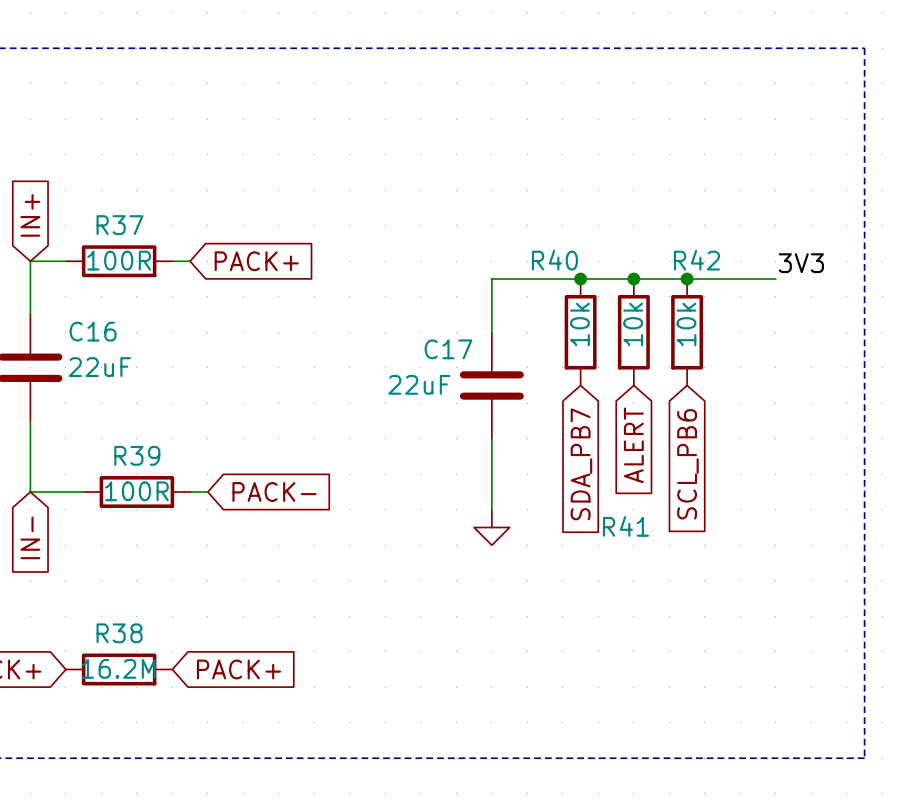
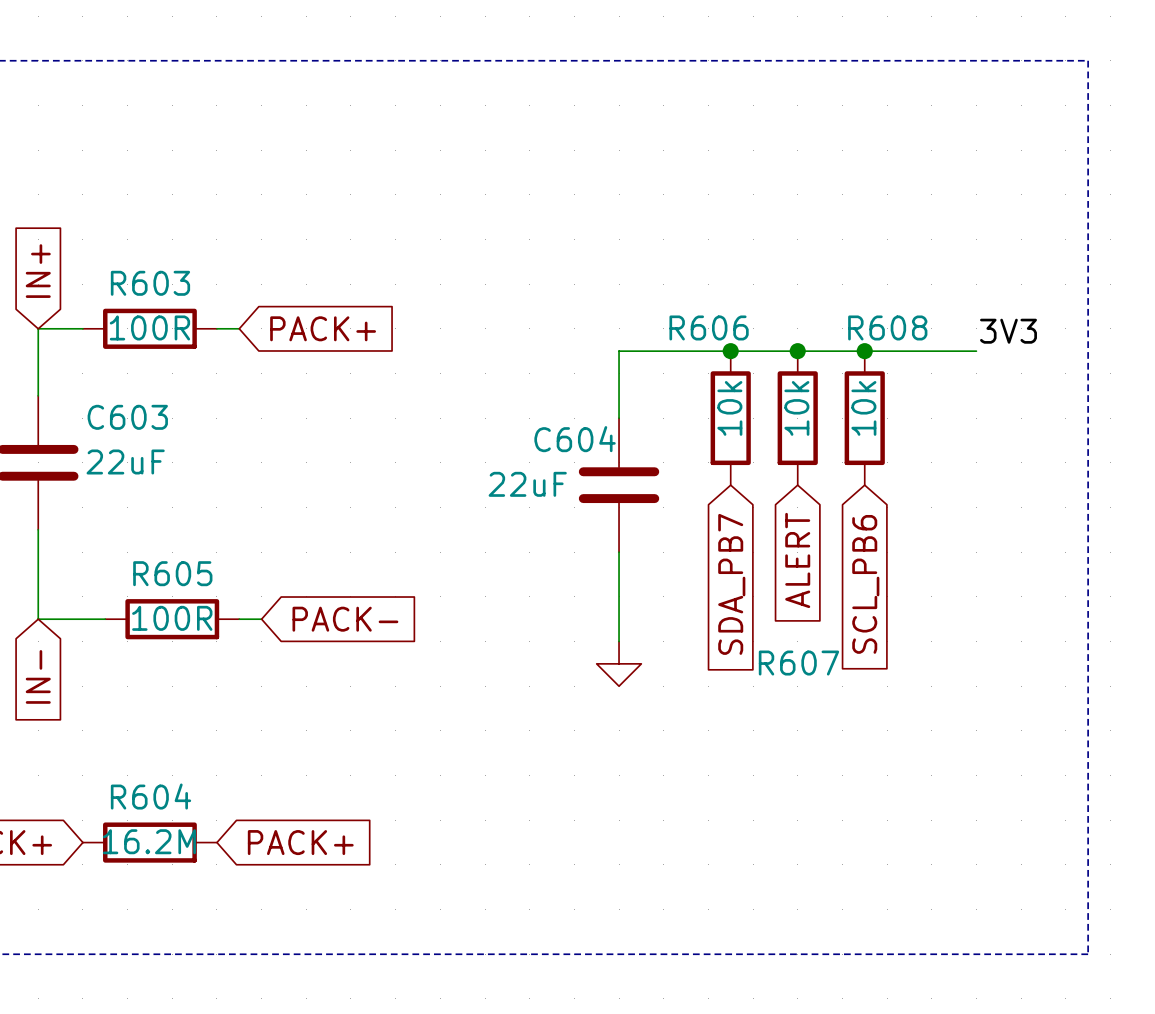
R37 name: R37 (119, 225) -> R603 (150, 283)
R40 name: R40 (554, 260) -> R606 (709, 327)
R42 name: R42 (696, 260) -> R608 (887, 327)
C16 name: C16 (93, 331) -> C603 (127, 417)
C17 name: C17 (448, 349) -> C604 (575, 439)
R39 name: R39 (137, 455) -> R605 (172, 573)
R41 name: R41 (625, 526) -> R607 (798, 663)
R38 name: R38 (119, 633) -> R604 (151, 796)

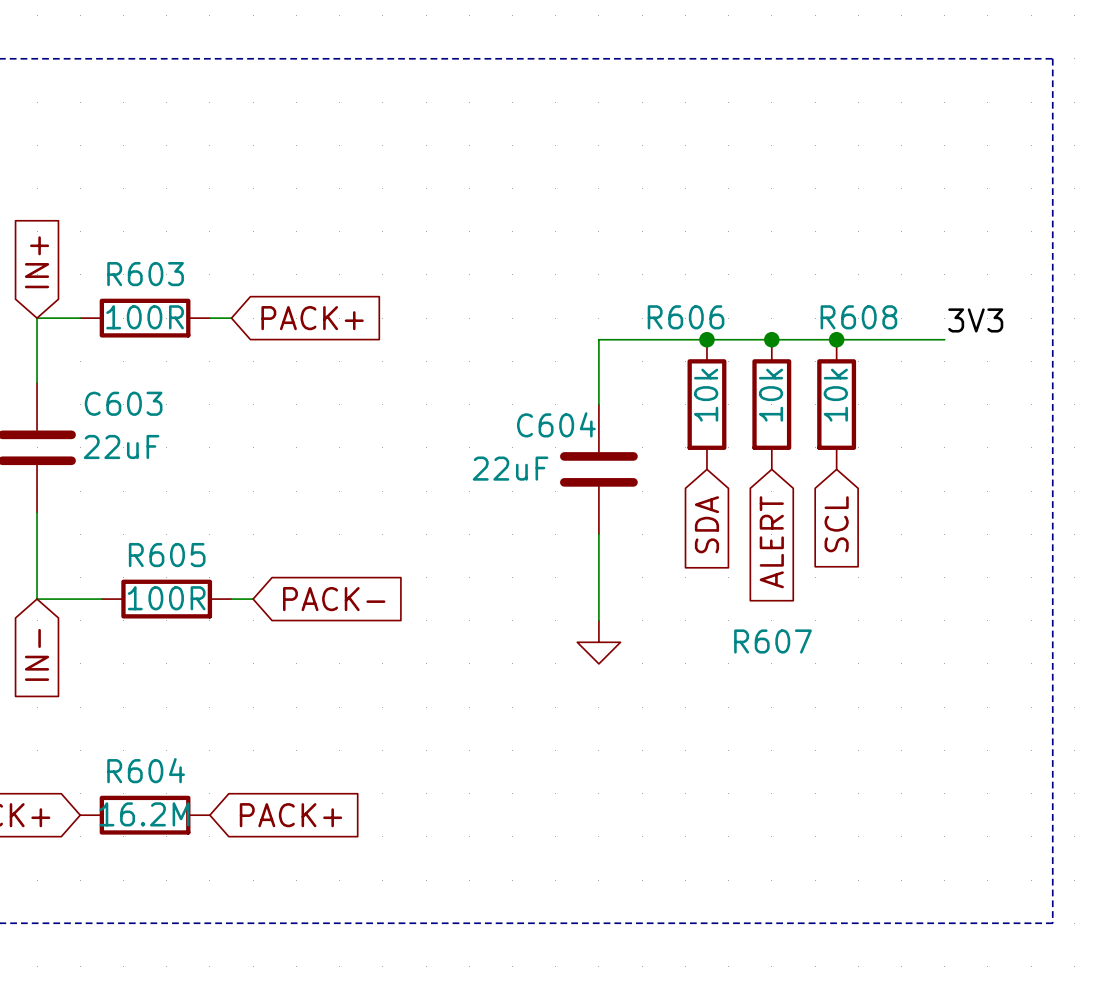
global label: SDA_PB7 (731, 584) -> SDA (706, 524)
global label: SCL_PB6 (865, 584) -> SCL (836, 524)

